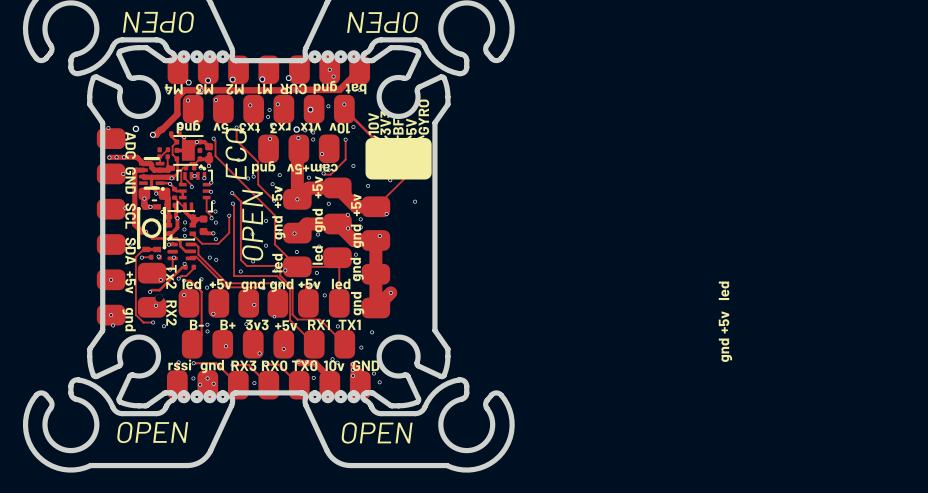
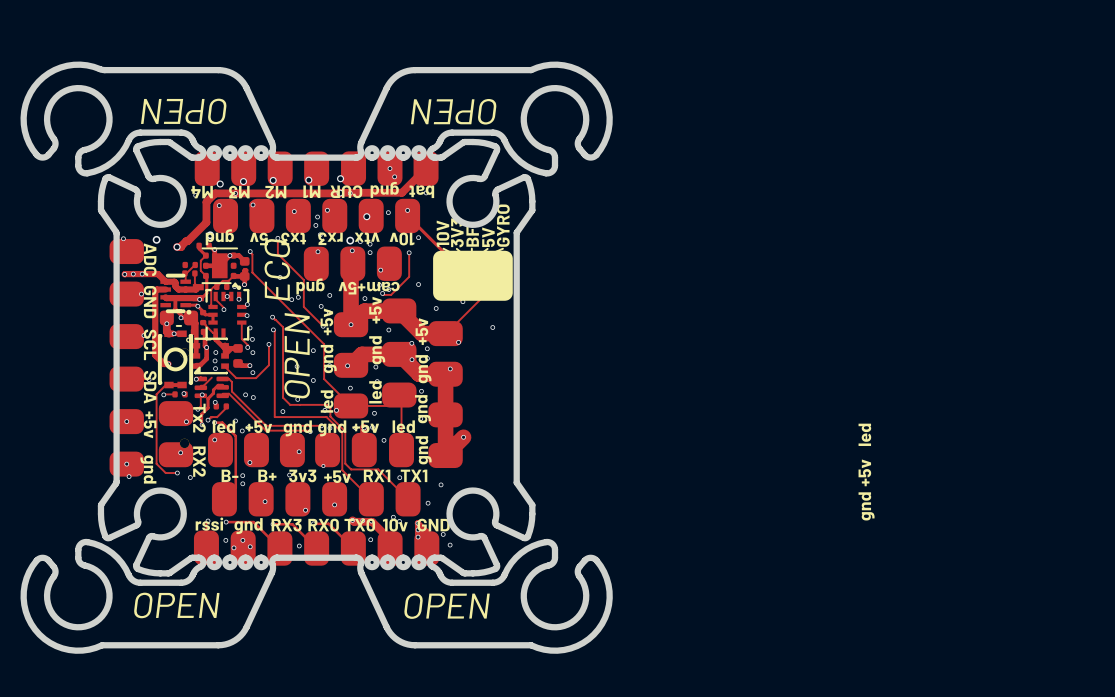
track: (145, 232) (152, 238) (176, 238) (185, 251) (190, 251) -> none
track: none -> (211, 377) (203, 385) (200, 385)
track: none -> (222, 385) (218, 385) (208, 398) (208, 407) (201, 414) (202, 424)
track: (185, 267) (182, 267) (159, 290) (150, 291) -> none
via position: (150, 291) -> (202, 424)

